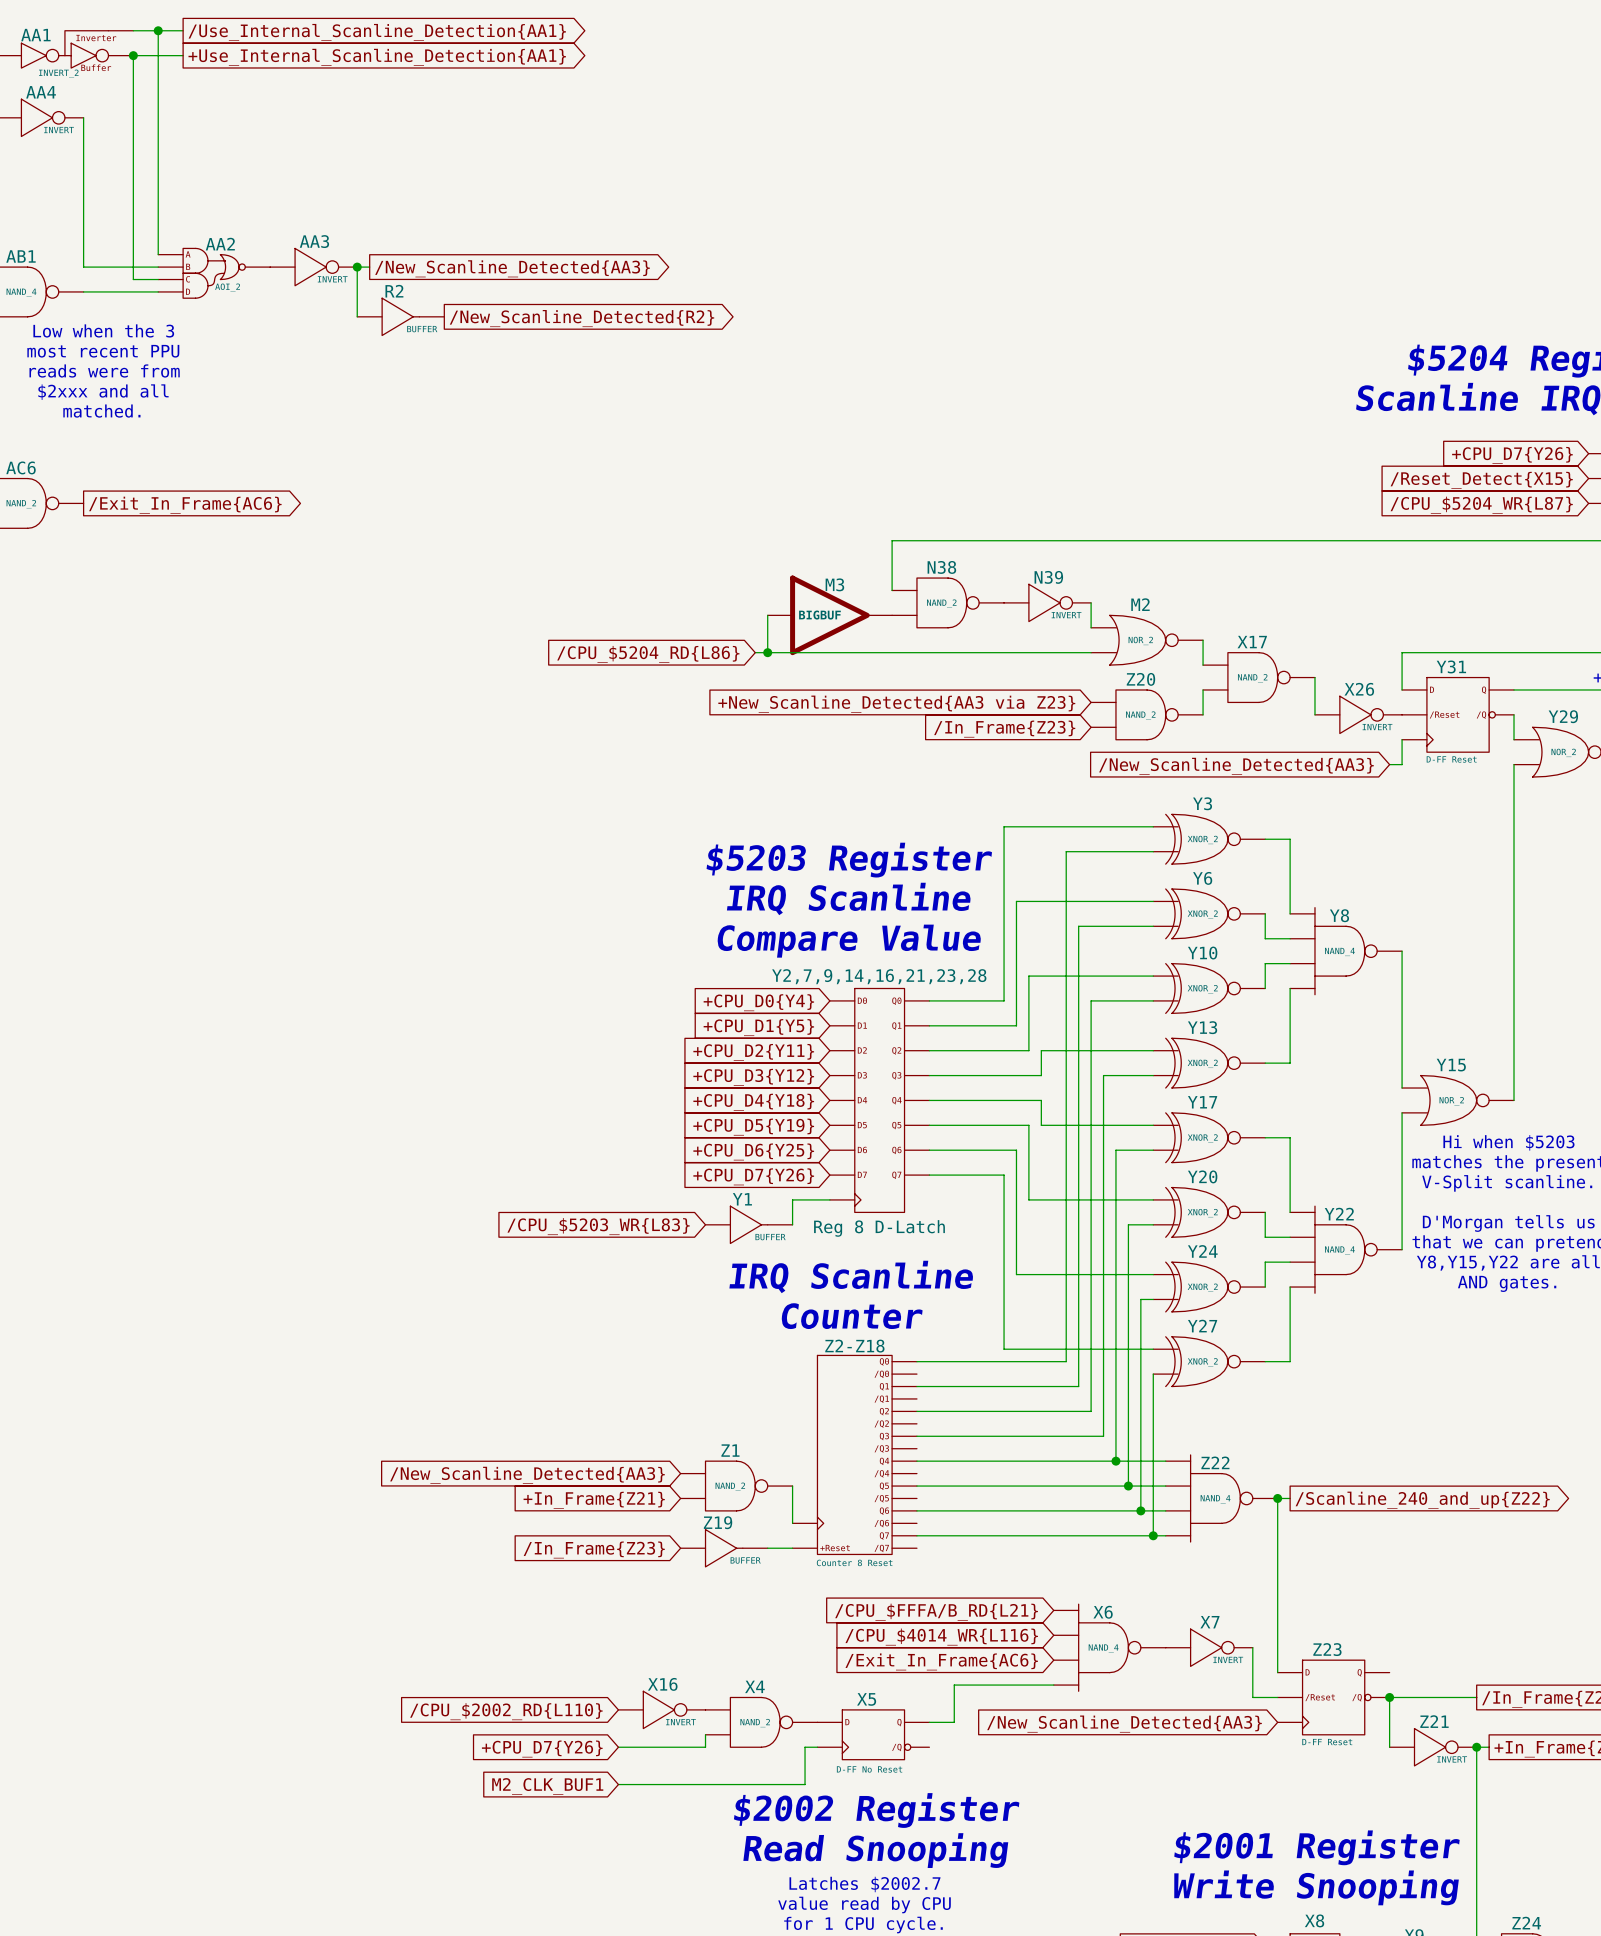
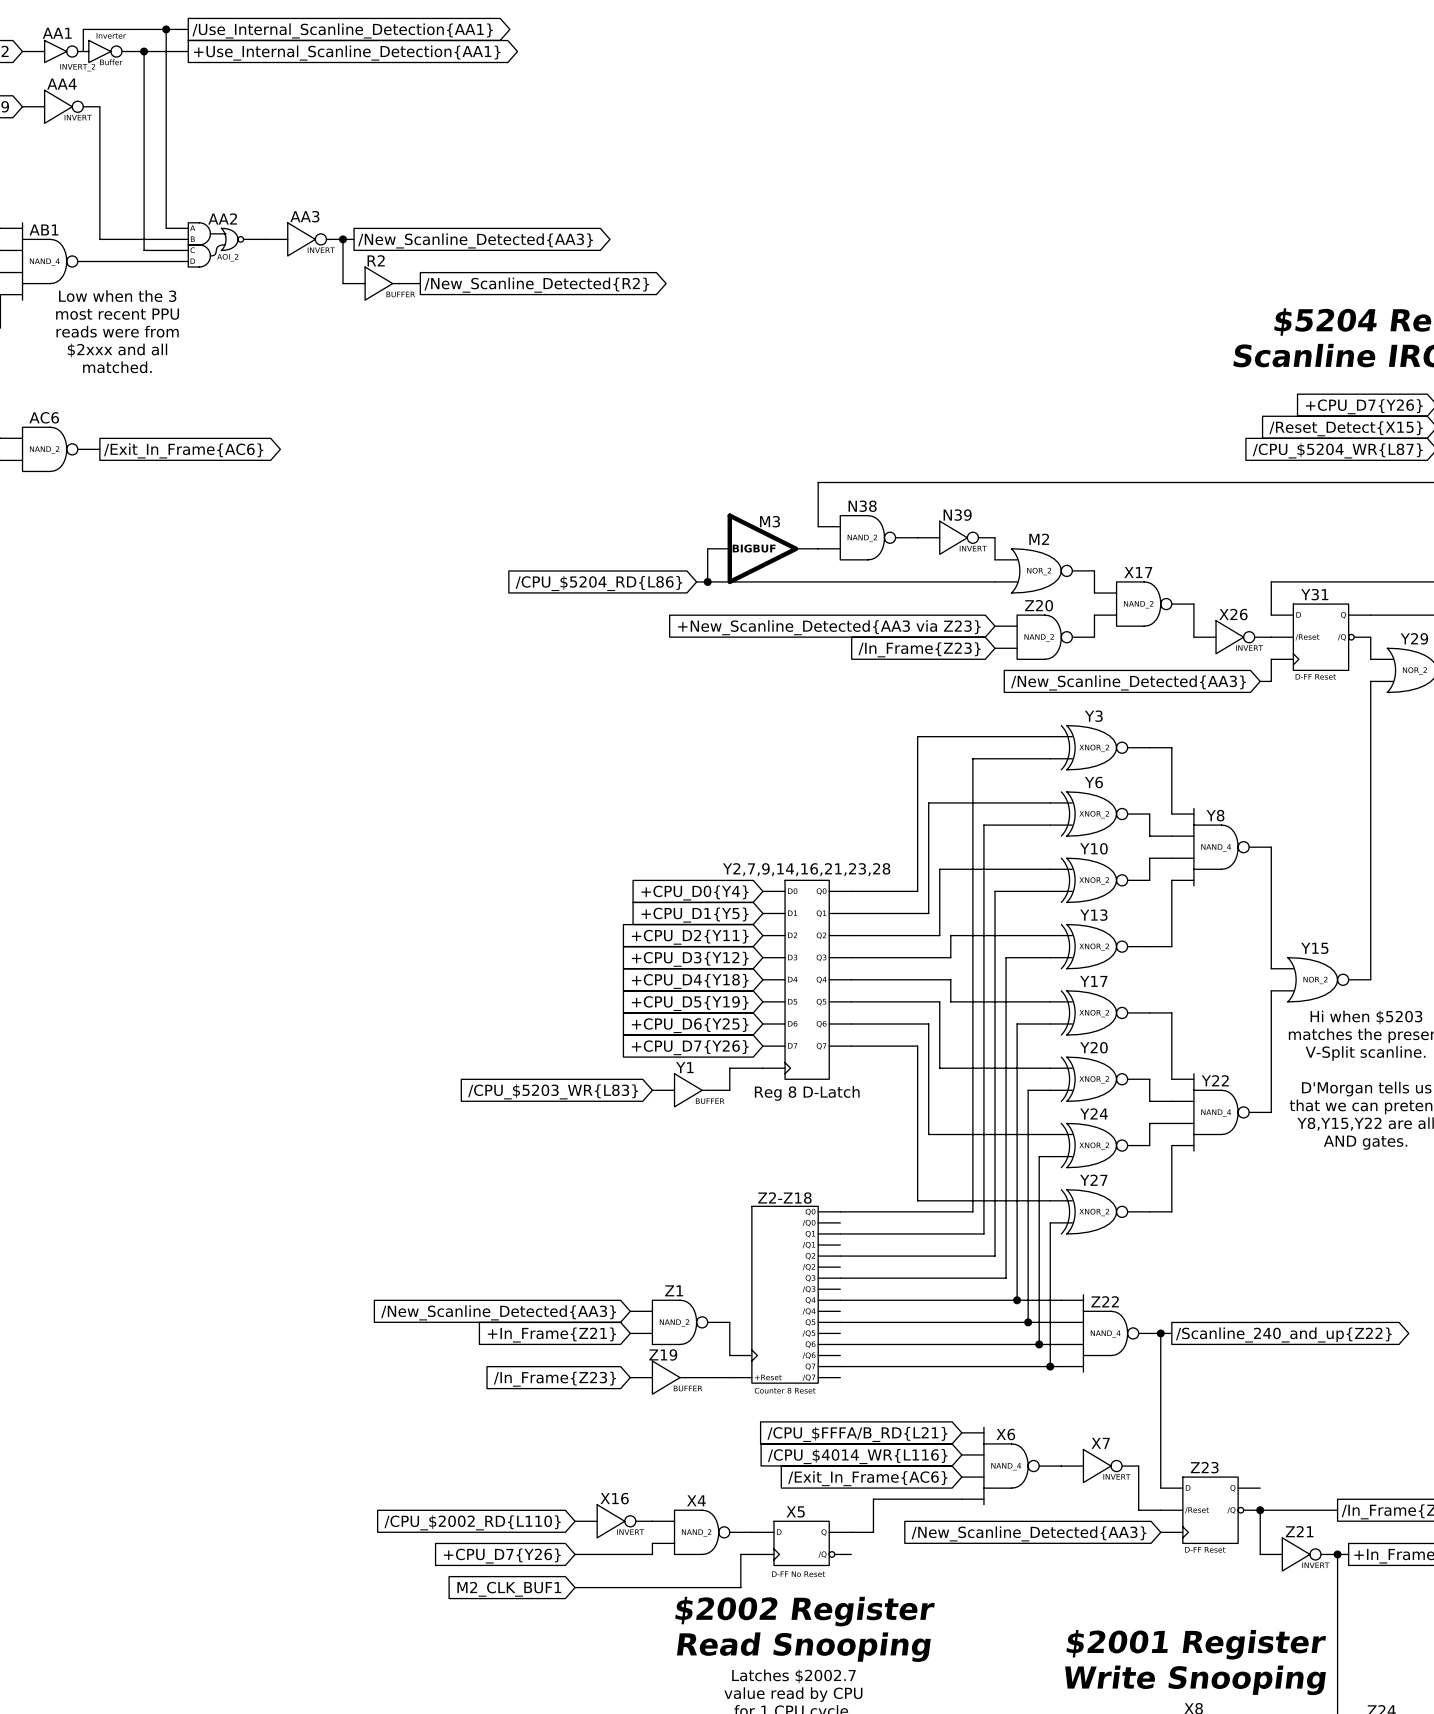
text: $5203 Register (849, 860) -> none
text: IRQ Scanline (848, 898) -> none
text: Compare Value (849, 941) -> none
text: IRQ Scanline (851, 1276) -> none
text: Counter (851, 1316) -> none

